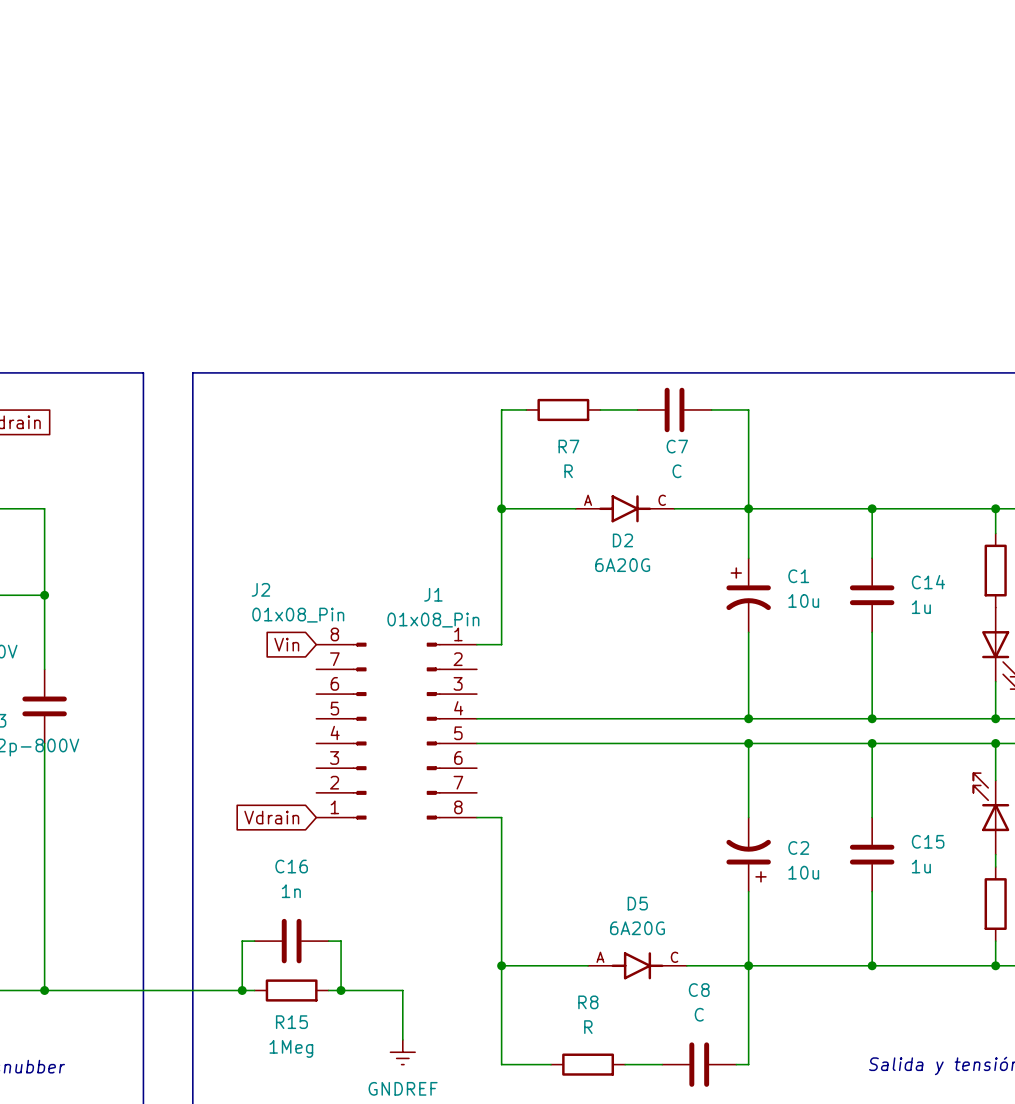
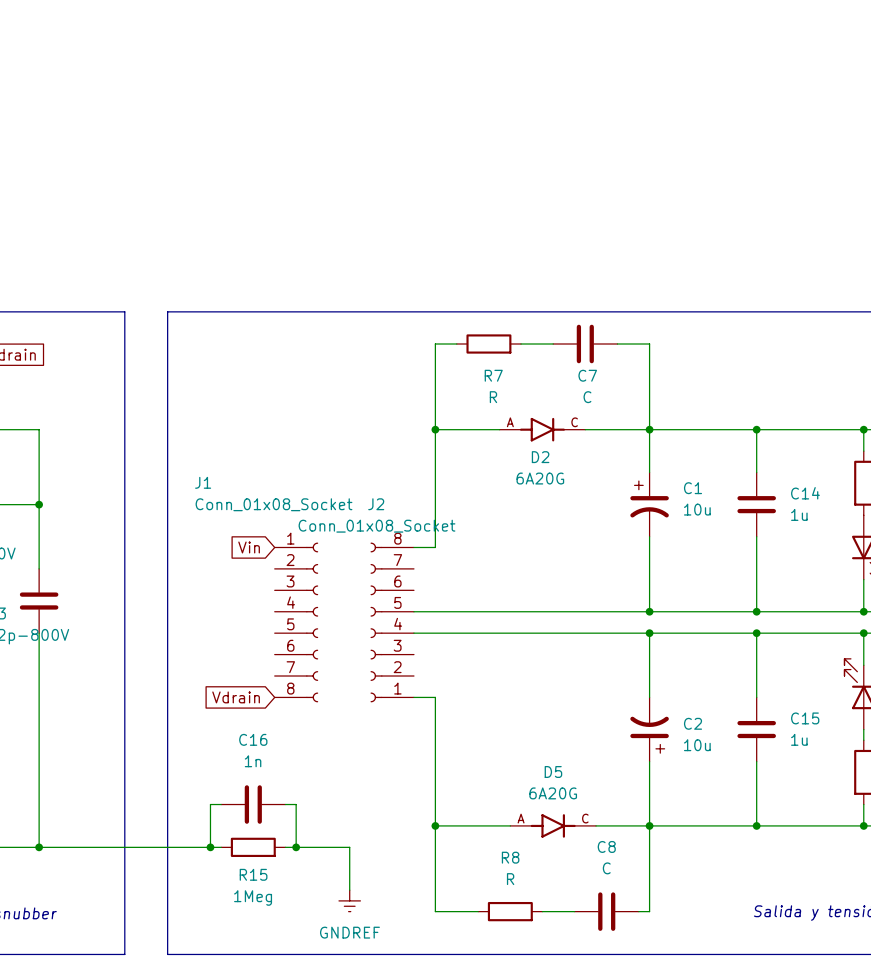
J2 name position: J2 (260, 589) -> J2 (376, 504)
J1 name position: J1 (433, 594) -> J1 (203, 482)
J2 value: 01x08_Pin (298, 615) -> Conn_01x08_Socket (376, 526)
J1 value: 01x08_Pin (433, 620) -> Conn_01x08_Socket (274, 504)
J2 symbol: [316, 642, 367, 820] -> [370, 542, 414, 703]
J1 symbol: [426, 642, 477, 820] -> [274, 542, 319, 703]

